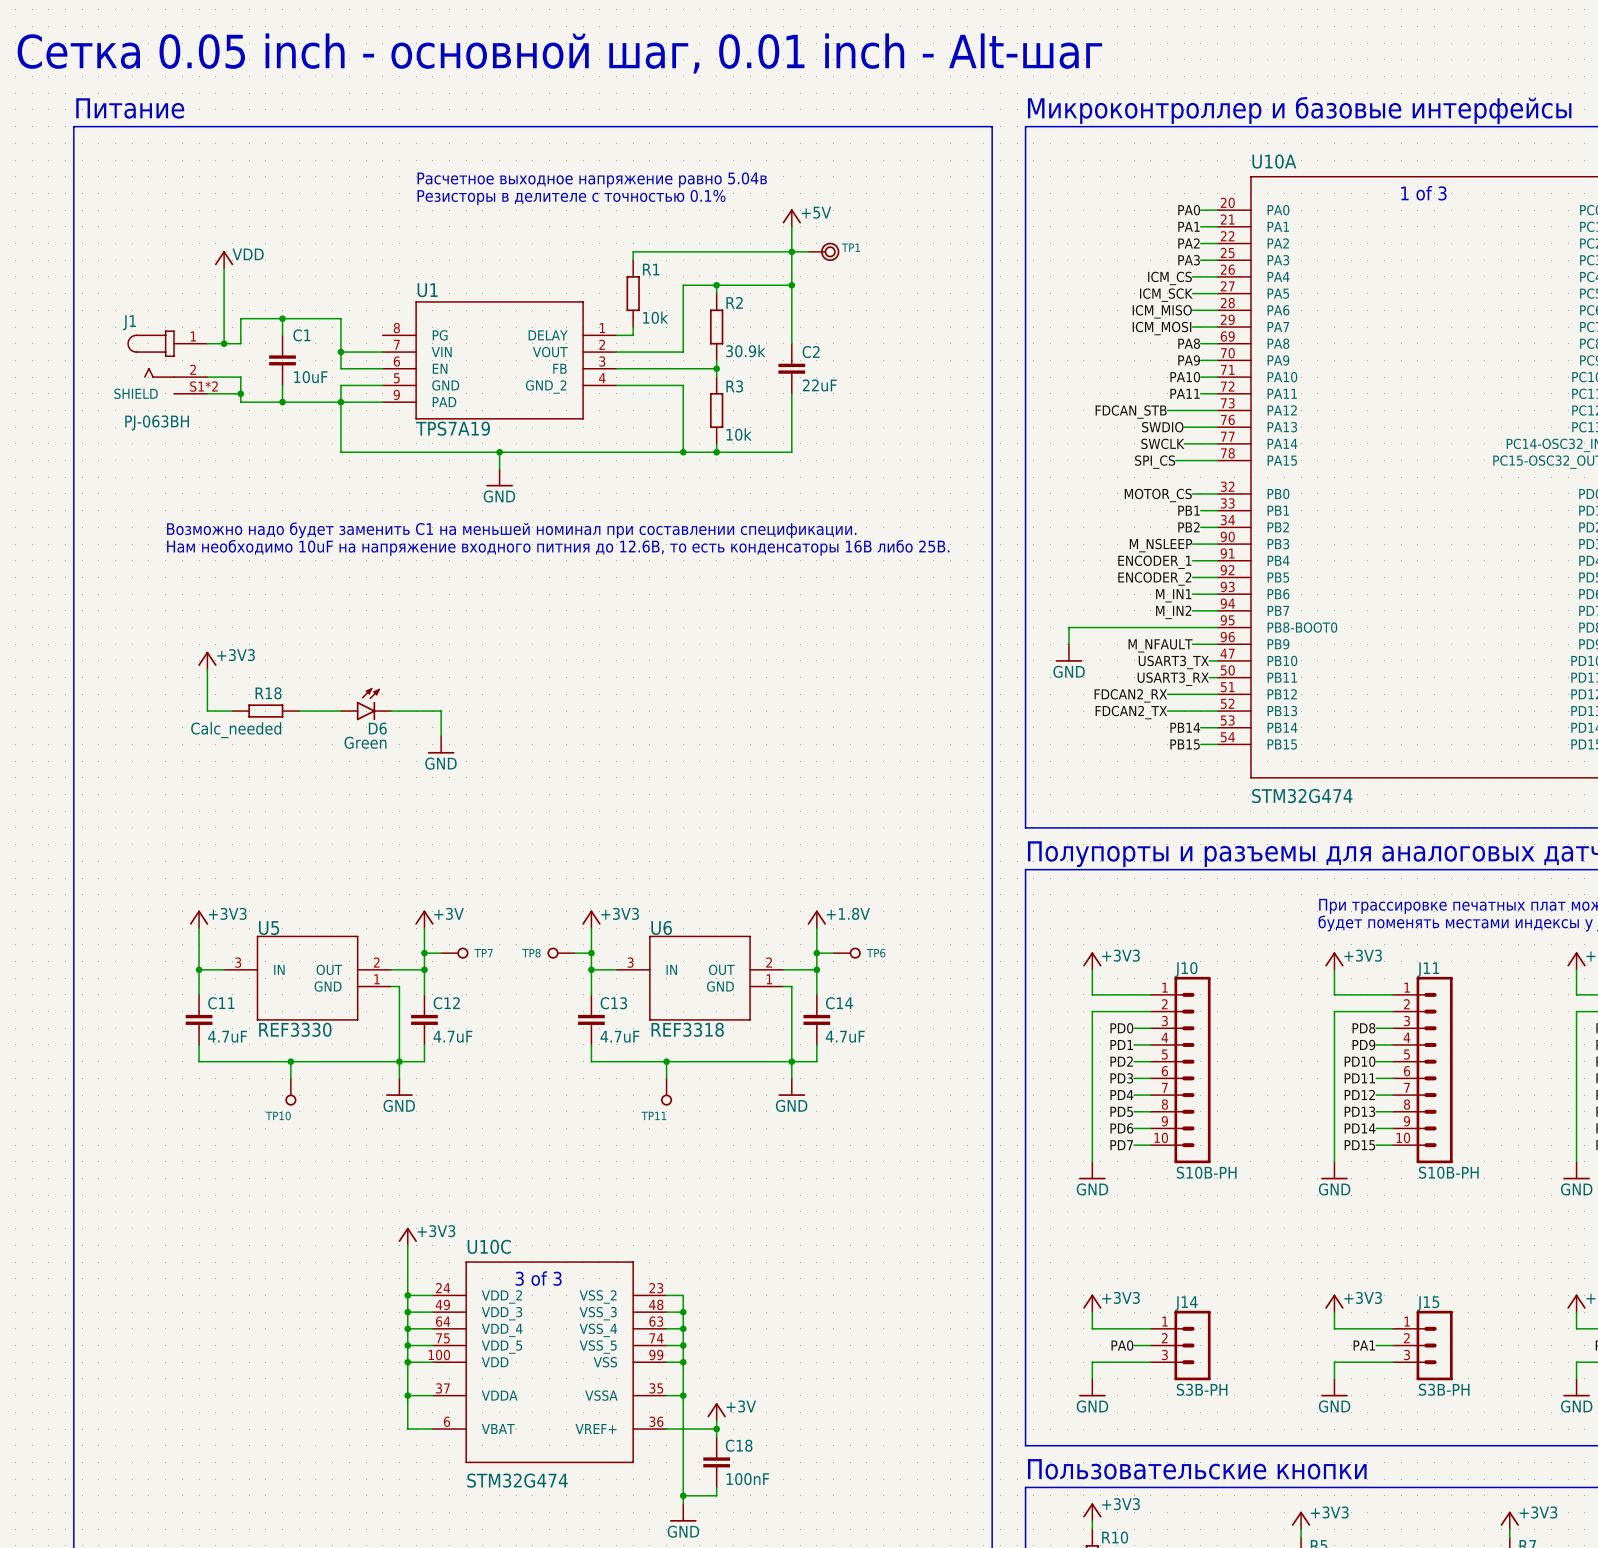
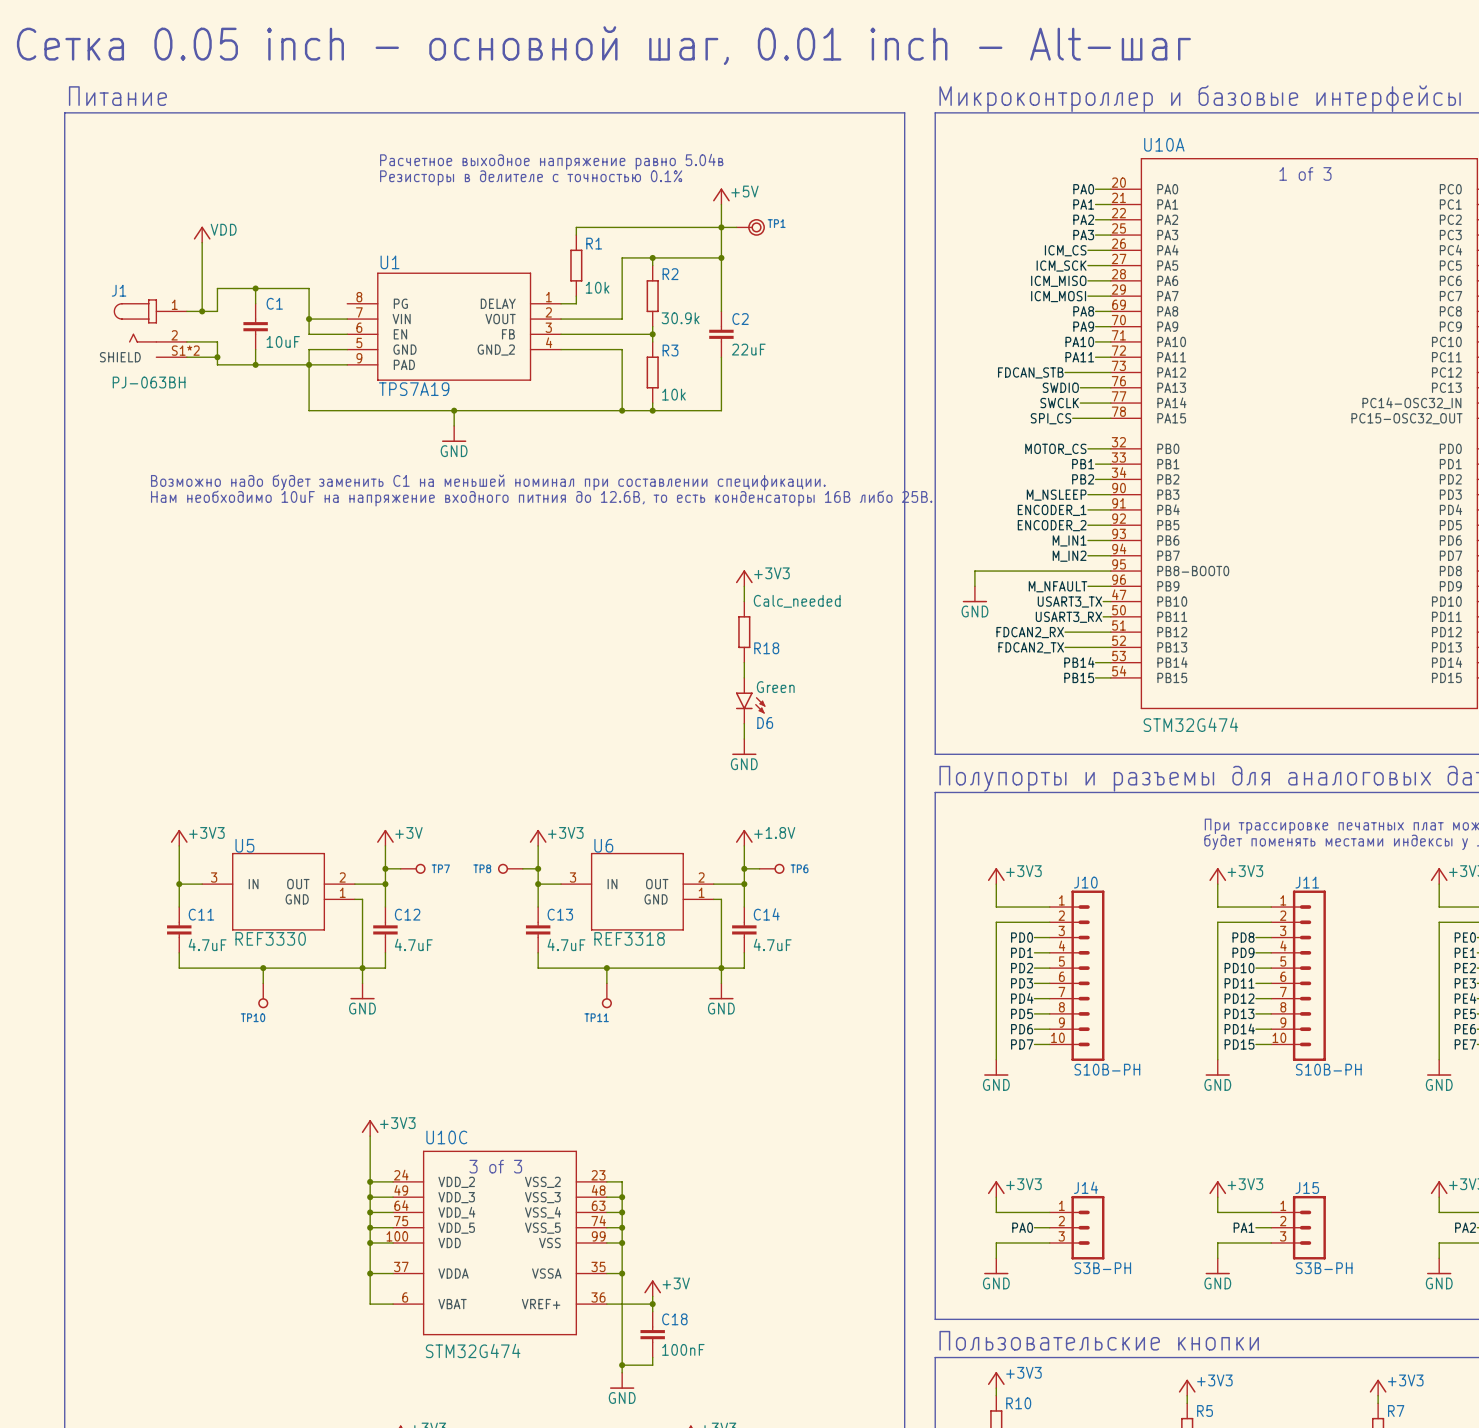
power symbol: none -> +3V3 (744, 578)
wire: none -> (744, 586) (744, 601)
power symbol: +3V3 (207, 660) -> none
wire: (207, 669) (207, 711) (232, 711) -> none
R18 name position: R18 (268, 693) -> R18 (766, 648)
D6 position: (366, 704) -> (750, 700)
D6 rotation: 0° (368, 704) -> 90° clockwise (750, 702)
R18 rotation: 0° (265, 711) -> 90° clockwise (744, 632)
R18 position: (265, 711) -> (744, 632)
wire: (299, 711) (340, 711) -> none
wire: (391, 711) (441, 711) (441, 736) -> none
wire: none -> (744, 662) (744, 677)
R18 value position: Calc_needed (236, 730) -> Calc_needed (797, 601)
D6 value position: Green (365, 742) -> Green (775, 687)
power symbol: GND (441, 744) -> none
wire: none -> (744, 723) (744, 739)
power symbol: none -> GND (744, 747)

